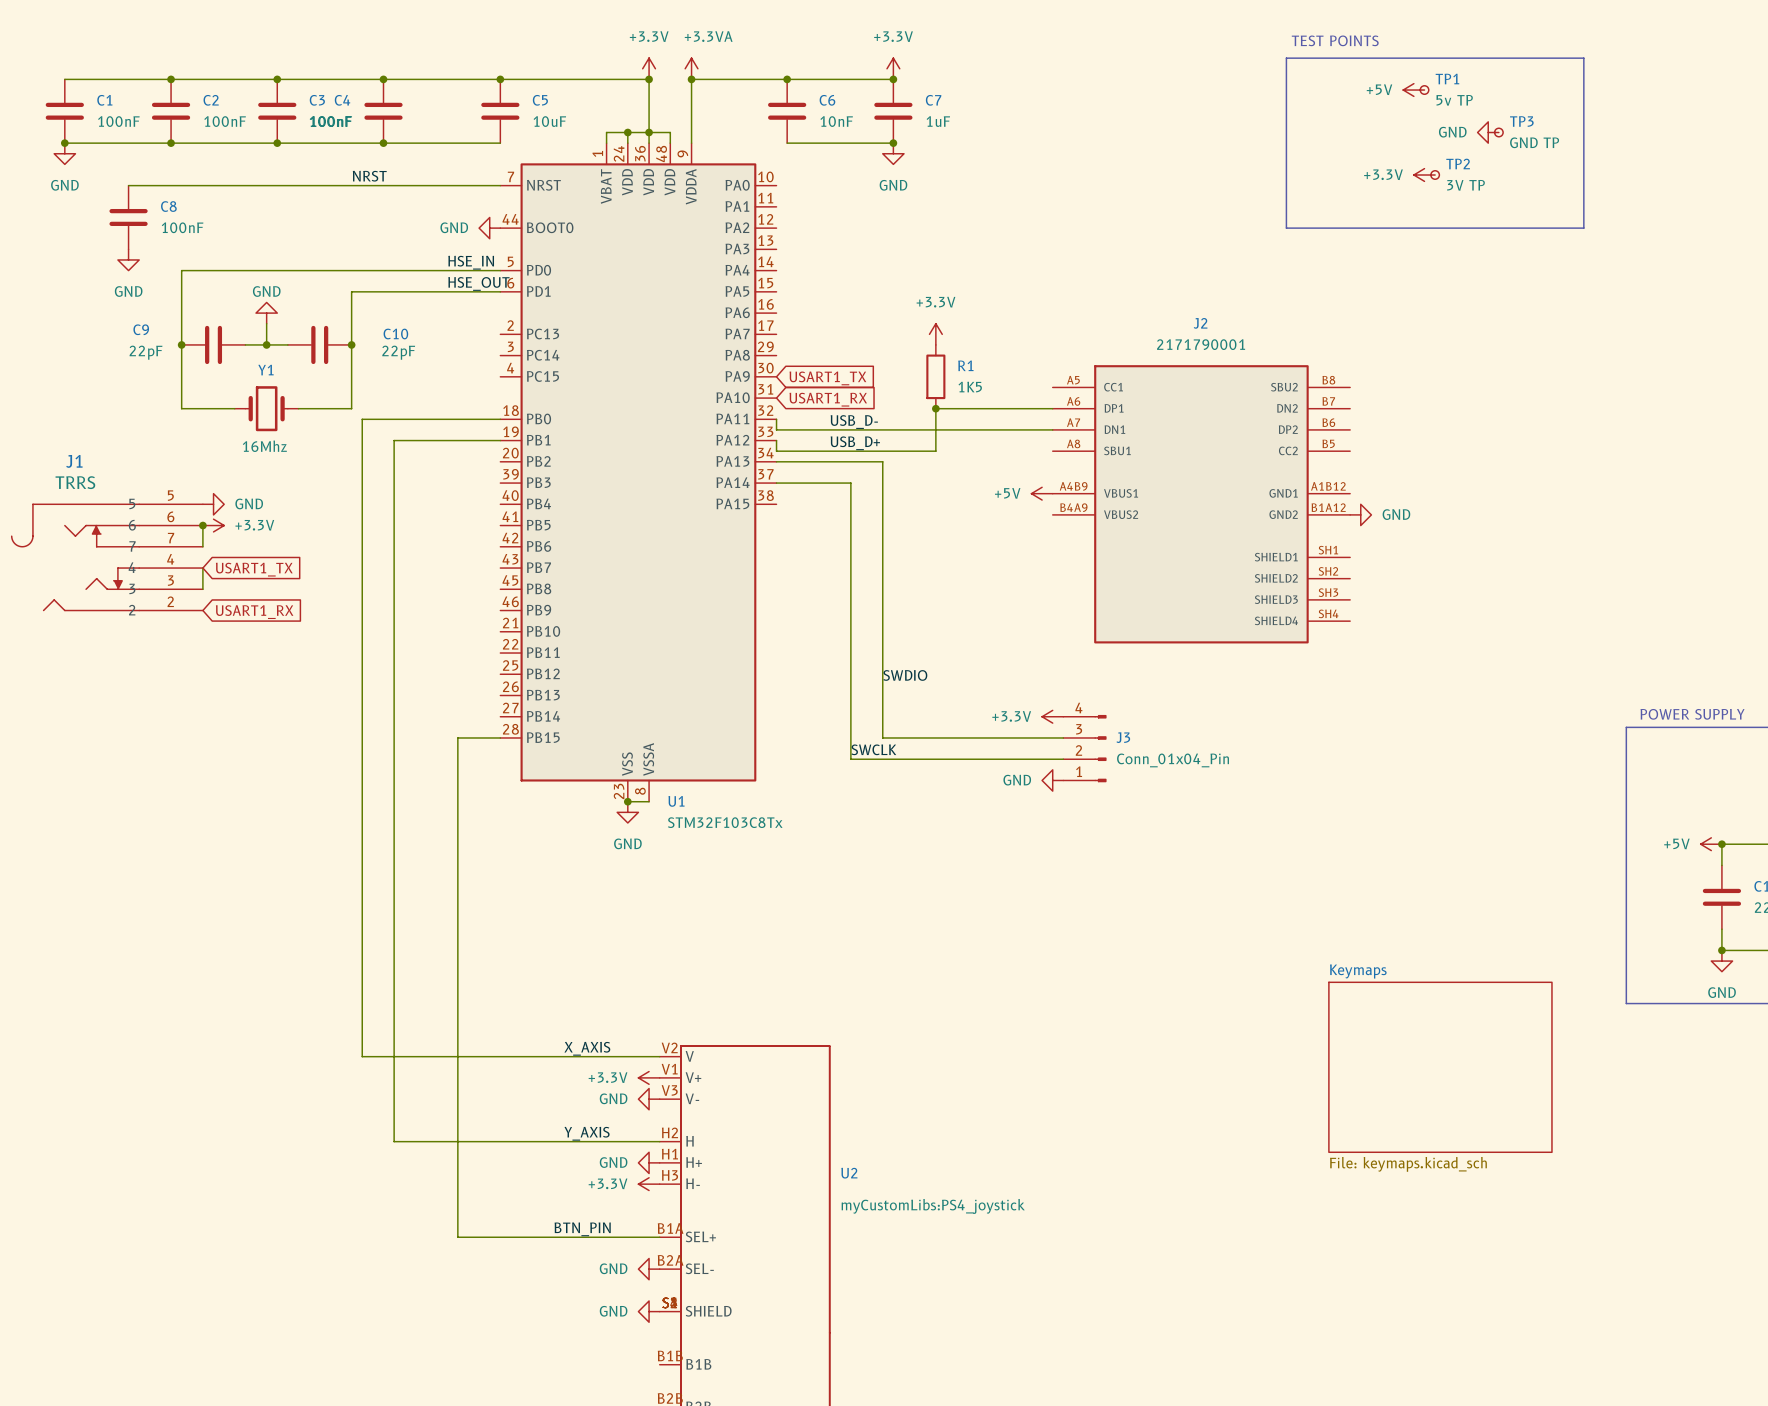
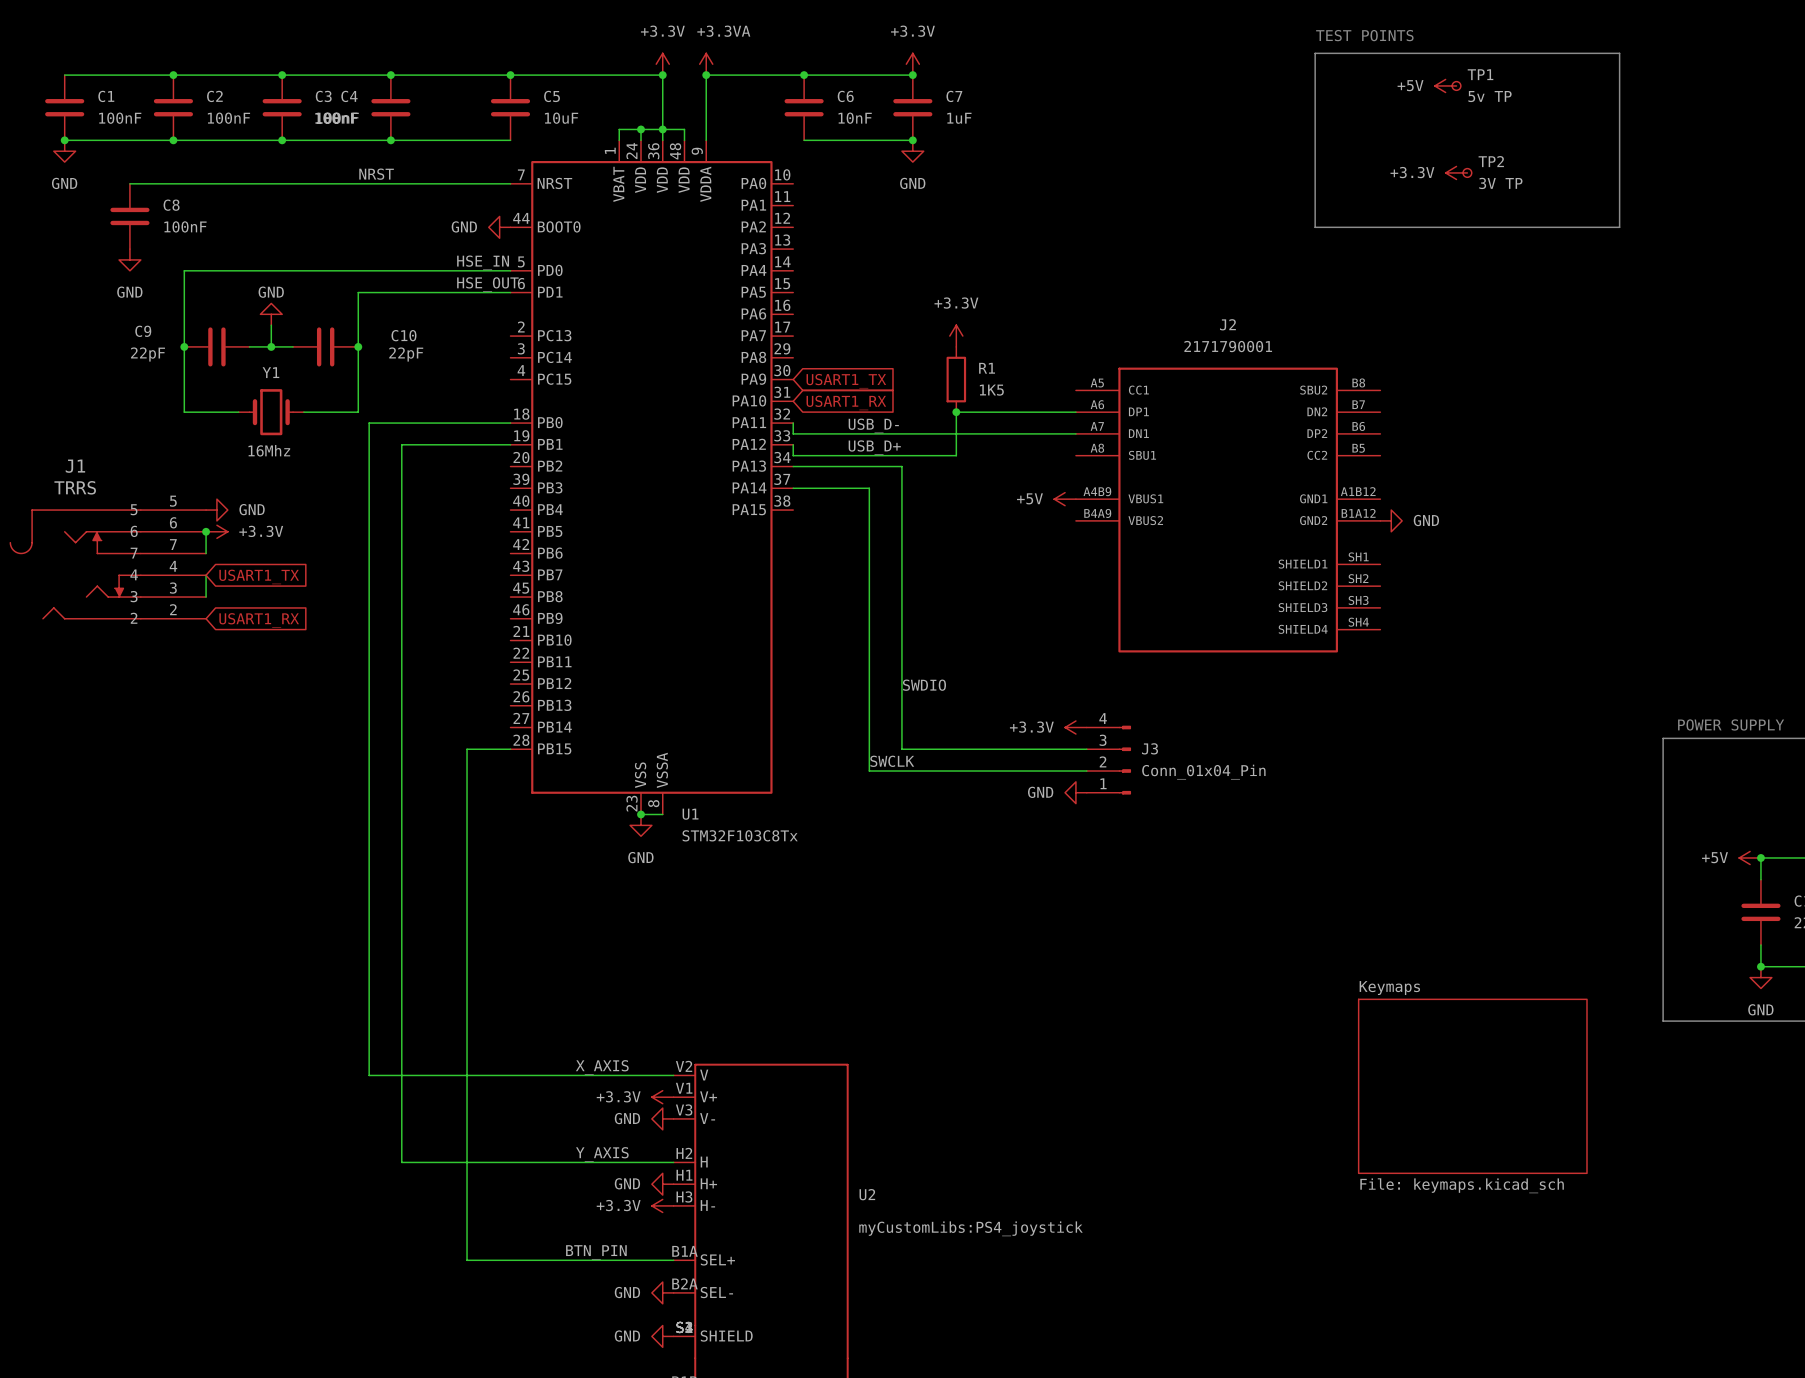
power symbol: GND (1488, 132) -> none
TP3: GND TP (1498, 132) -> none

